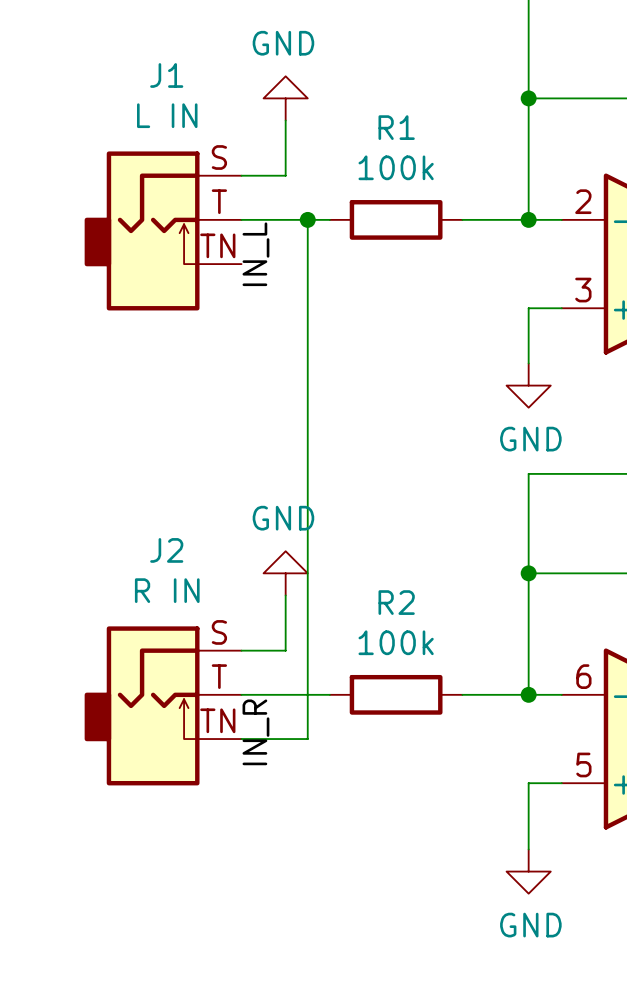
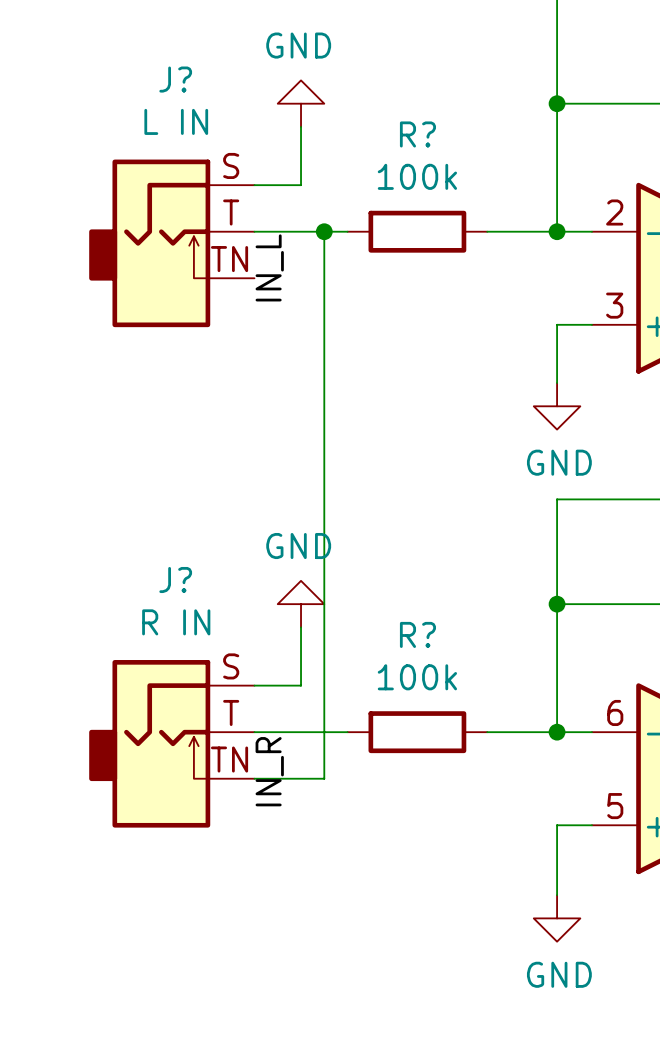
J1 name: J1 (166, 75) -> J? (175, 79)
R1 name: R1 (396, 127) -> R? (417, 134)
J2 name: J2 (166, 550) -> J? (175, 580)
R2 name: R2 (396, 602) -> R? (417, 634)

